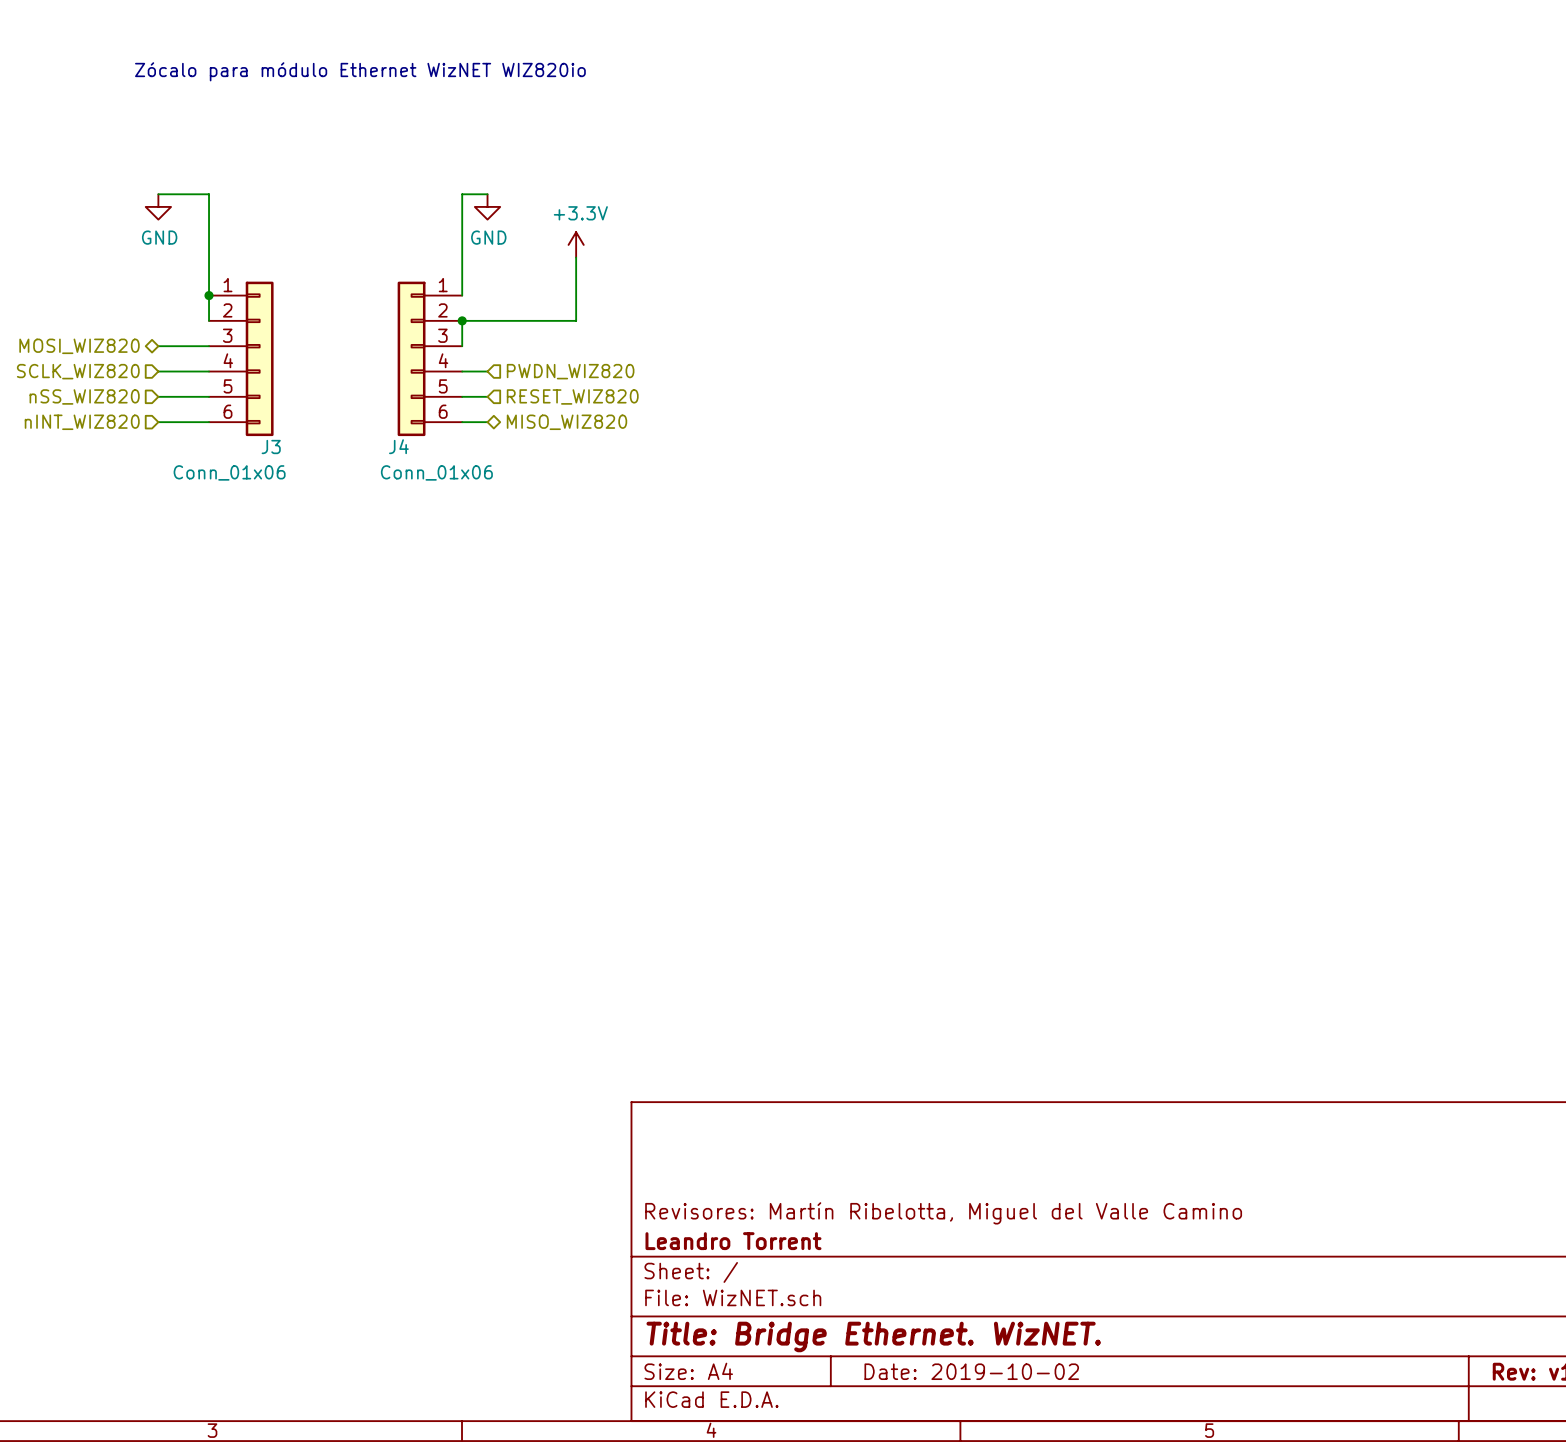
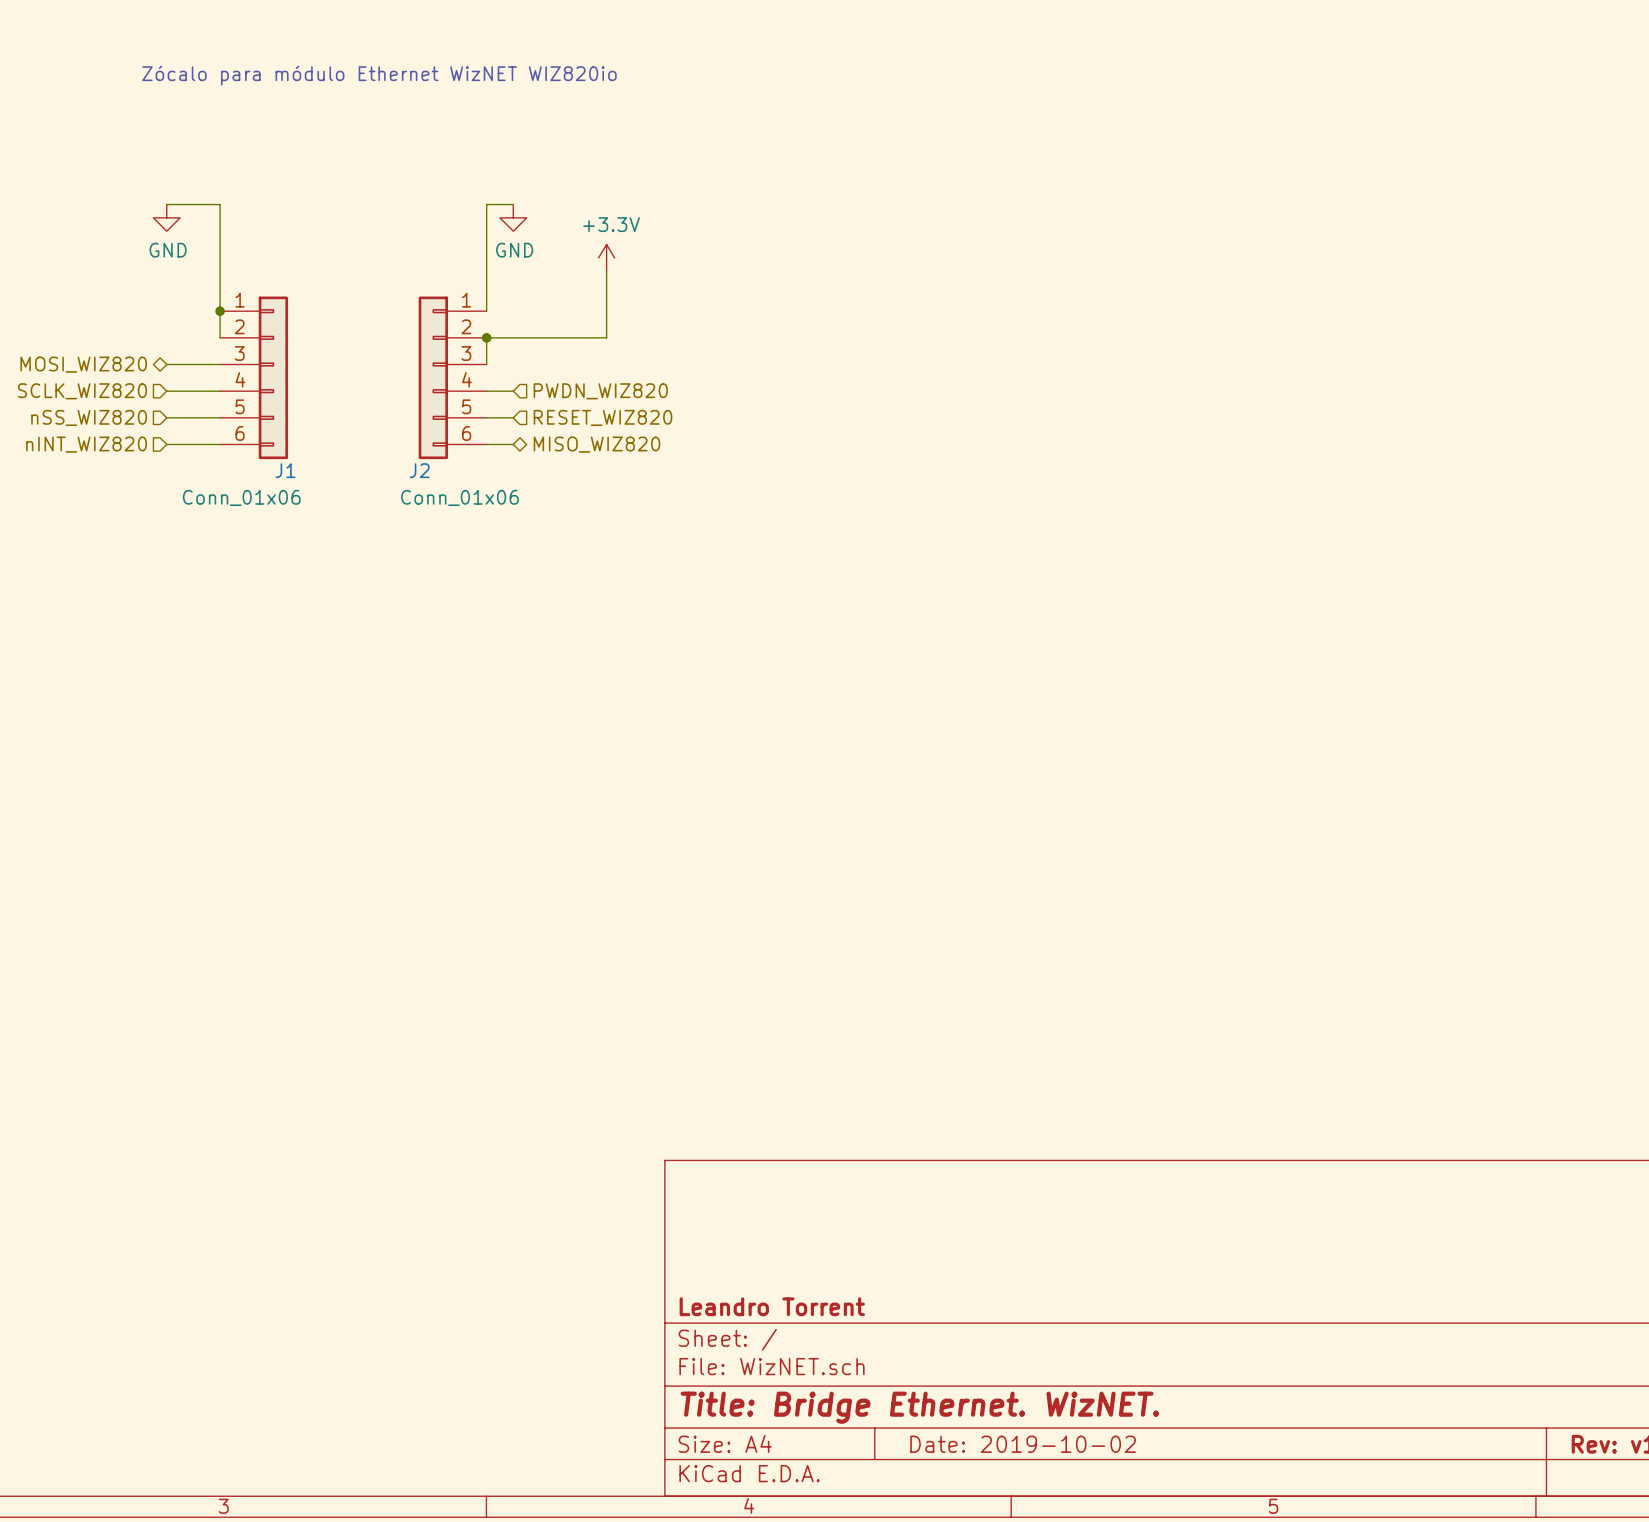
J4 name: J4 (398, 446) -> J2 (419, 470)
J3 name: J3 (271, 447) -> J1 (285, 470)
title block: Revisores: Martín Ribelotta, Miguel del Valle Camino (943, 1213) -> none

